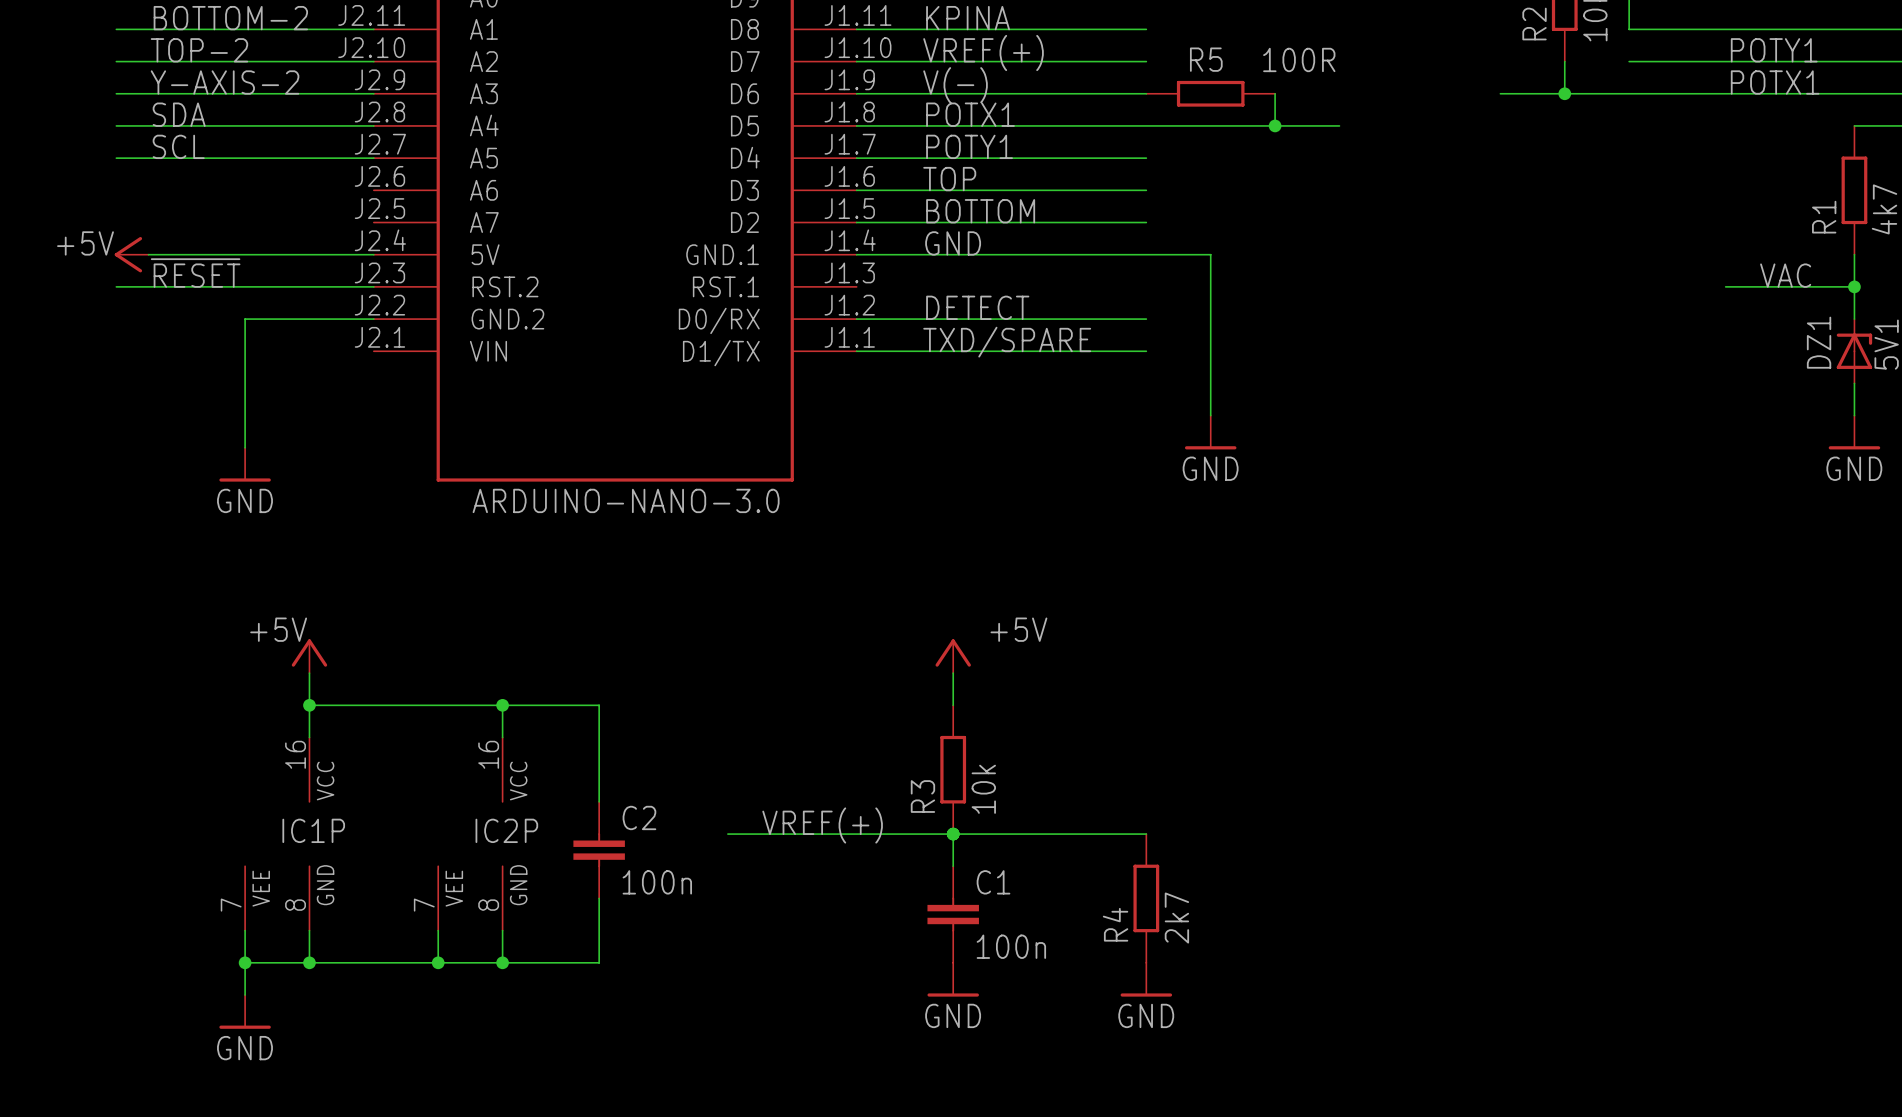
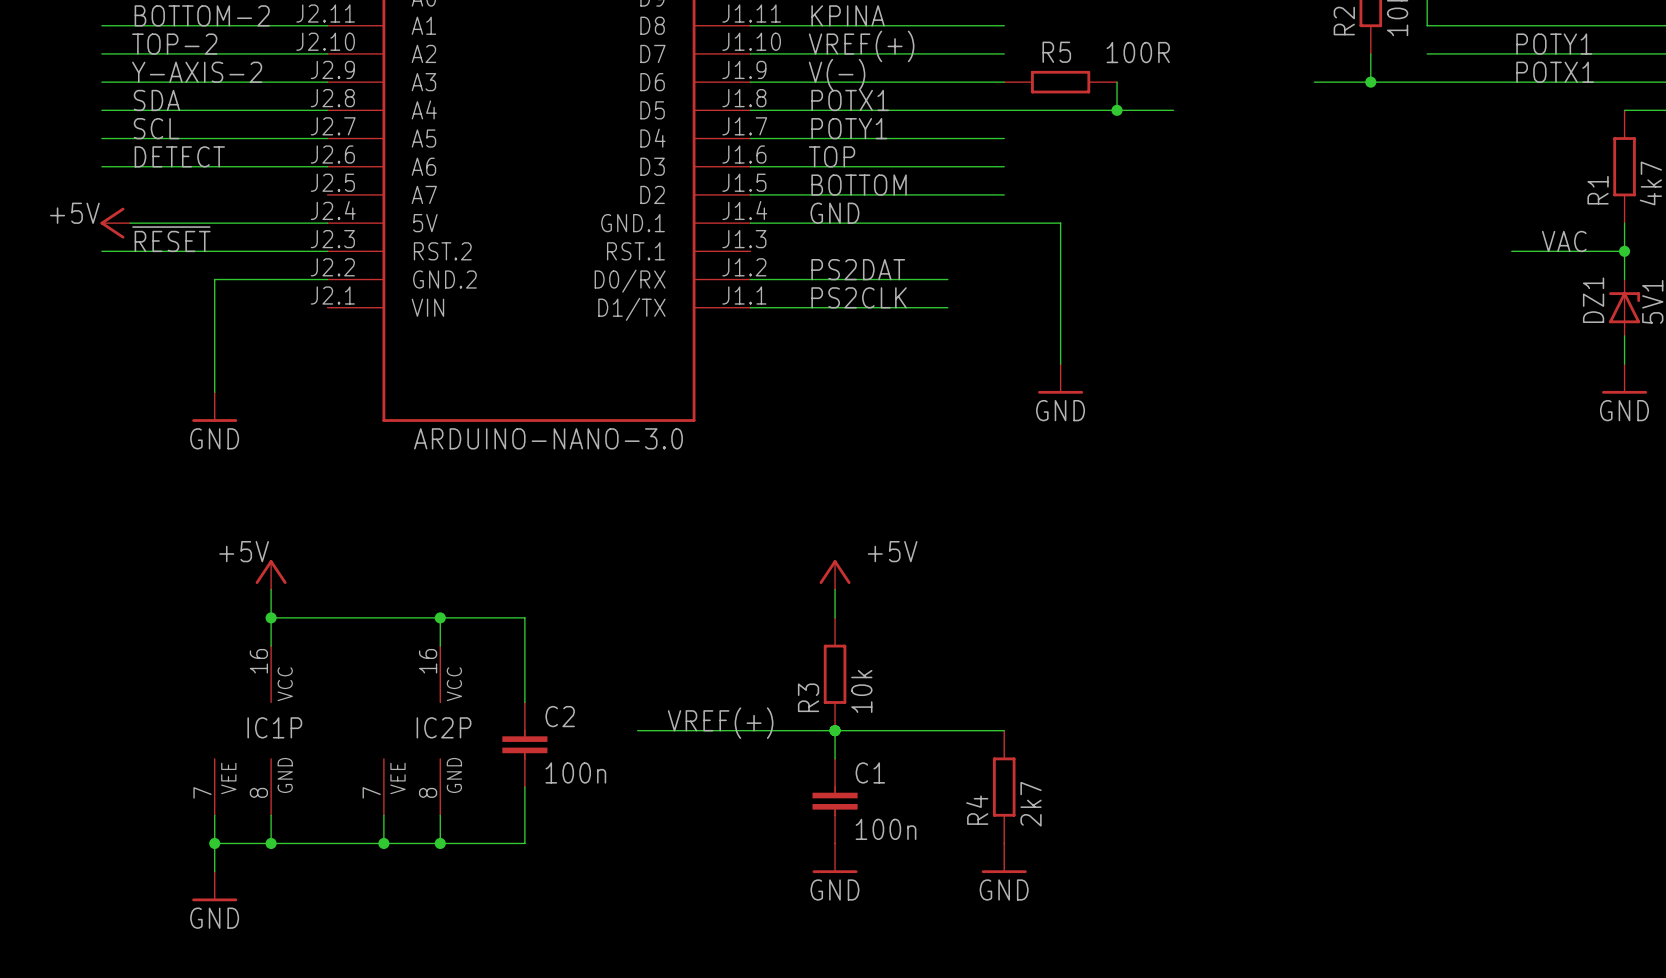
label: none -> DETECT (179, 156)
wire: none -> (101, 166) (327, 166)
label: DETECT (977, 307) -> PS2DAT (858, 269)
wire: (1081, 319) (1146, 319) -> none
label: TXD/SPARE (1007, 342) -> PS2CLK (859, 297)
wire: (1081, 351) (1146, 351) -> none

